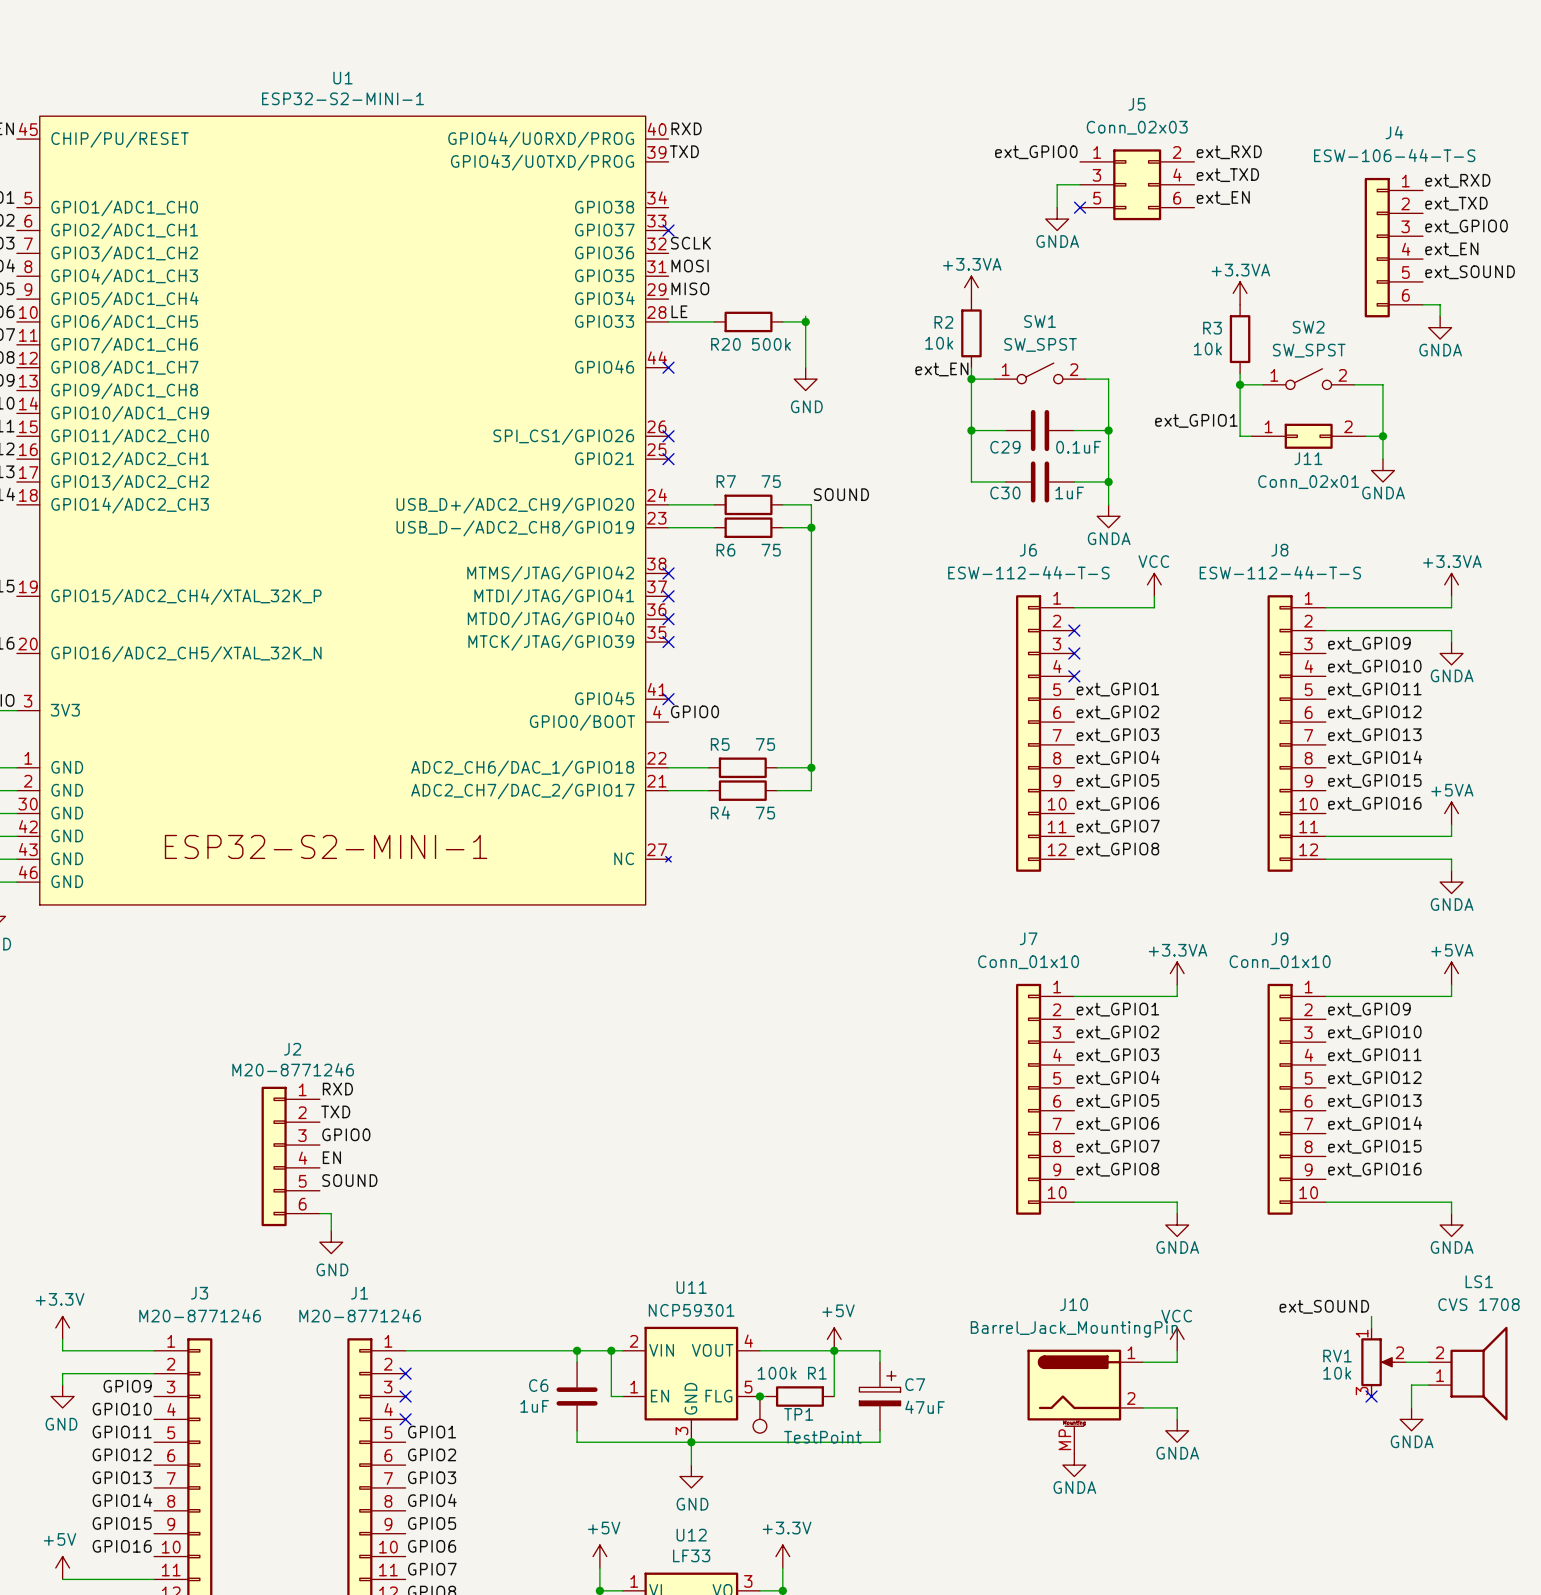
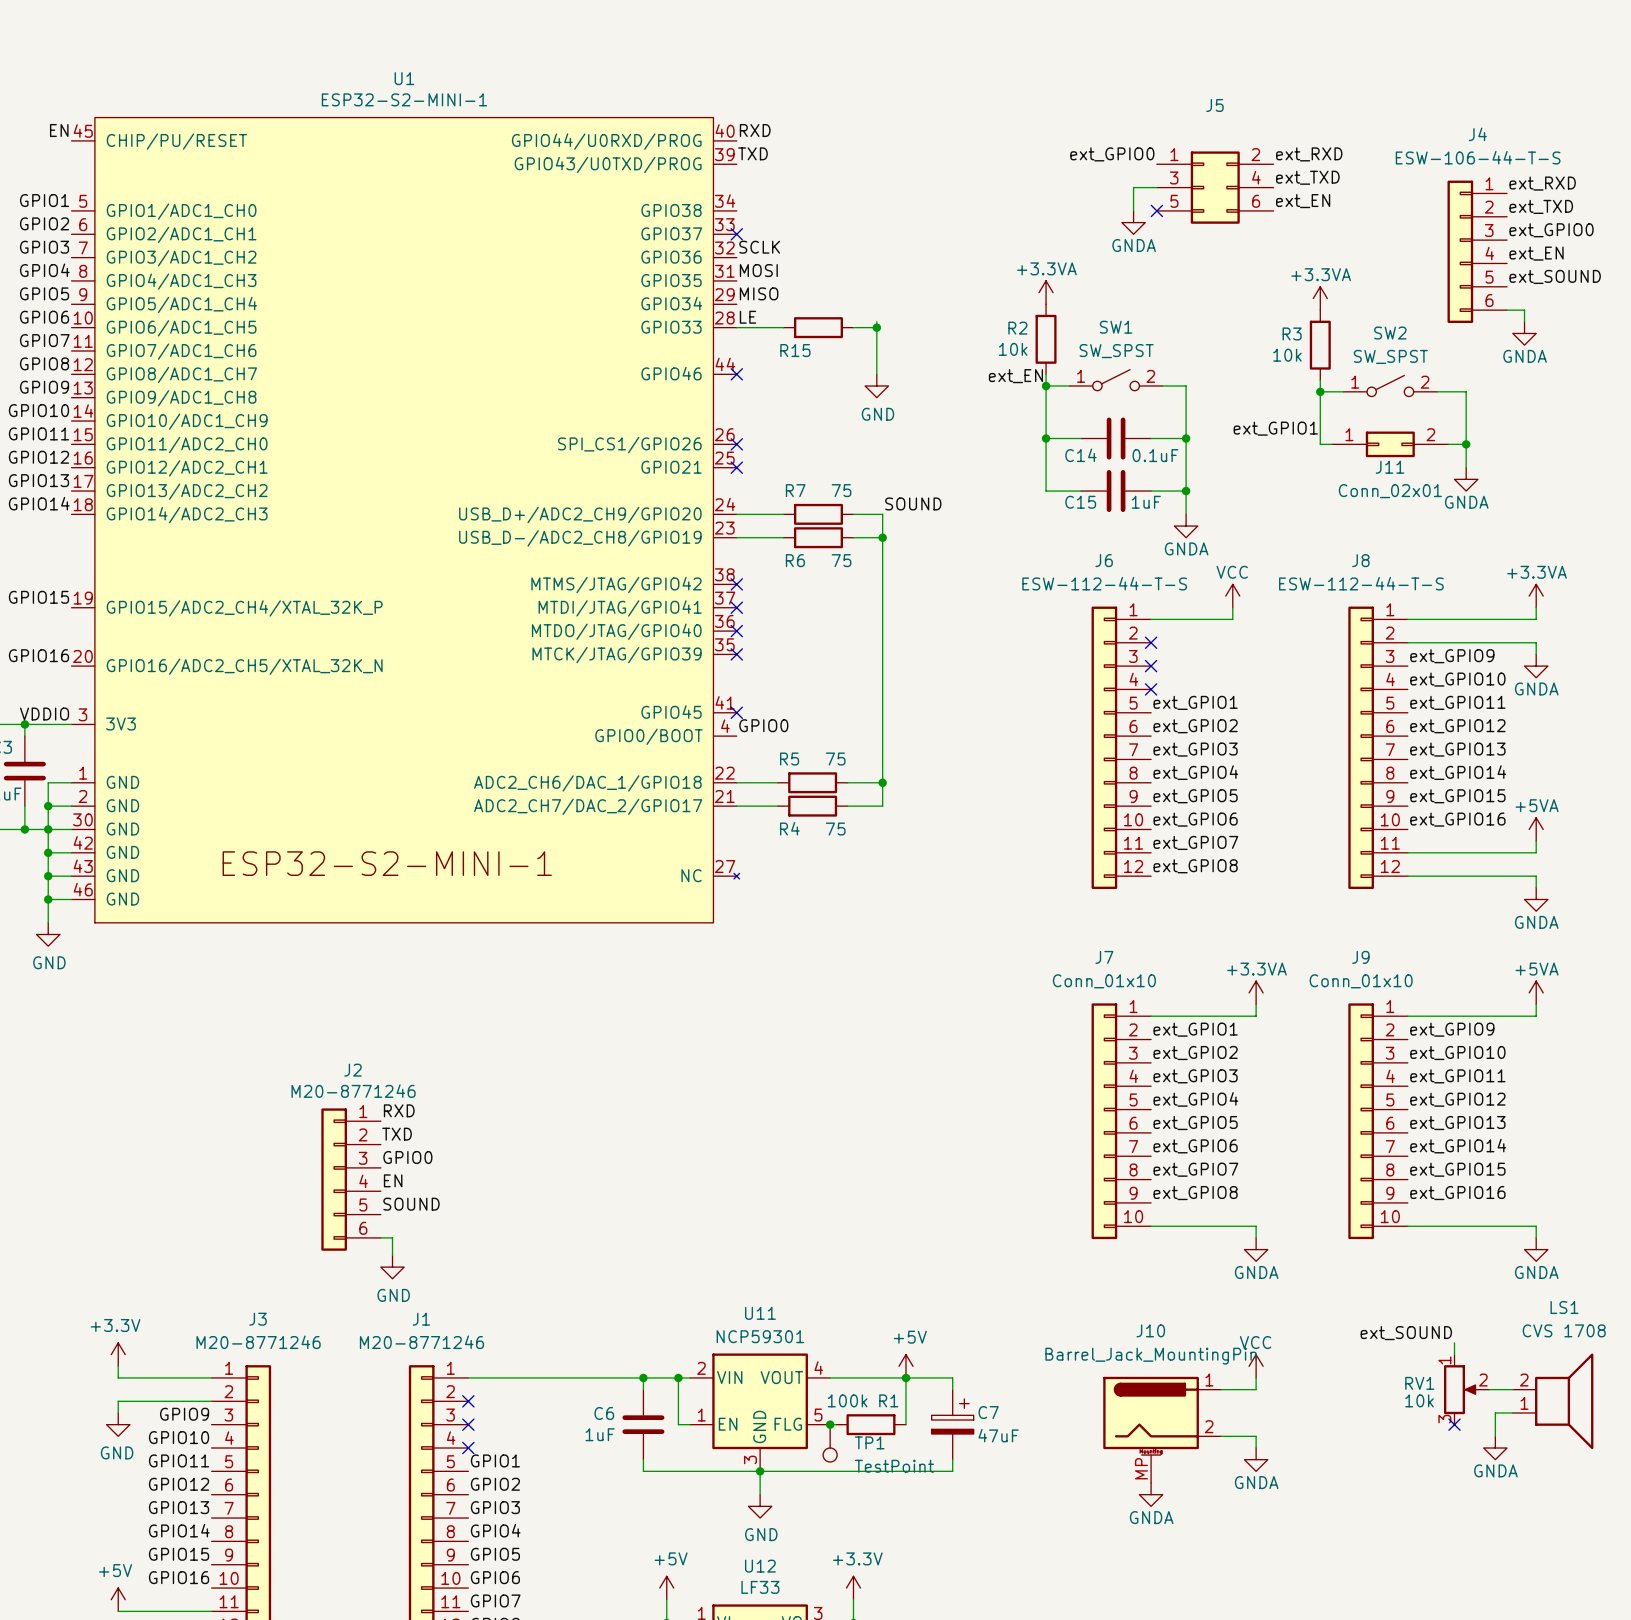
J5 value: Conn_02x03 (1137, 127) -> none
R20 name: R20 (725, 344) -> R15 (795, 350)
R20 value: 500k (771, 344) -> none
C29 name: C29 (1005, 447) -> C14 (1080, 455)
C30 name: C30 (1005, 492) -> C15 (1080, 502)

